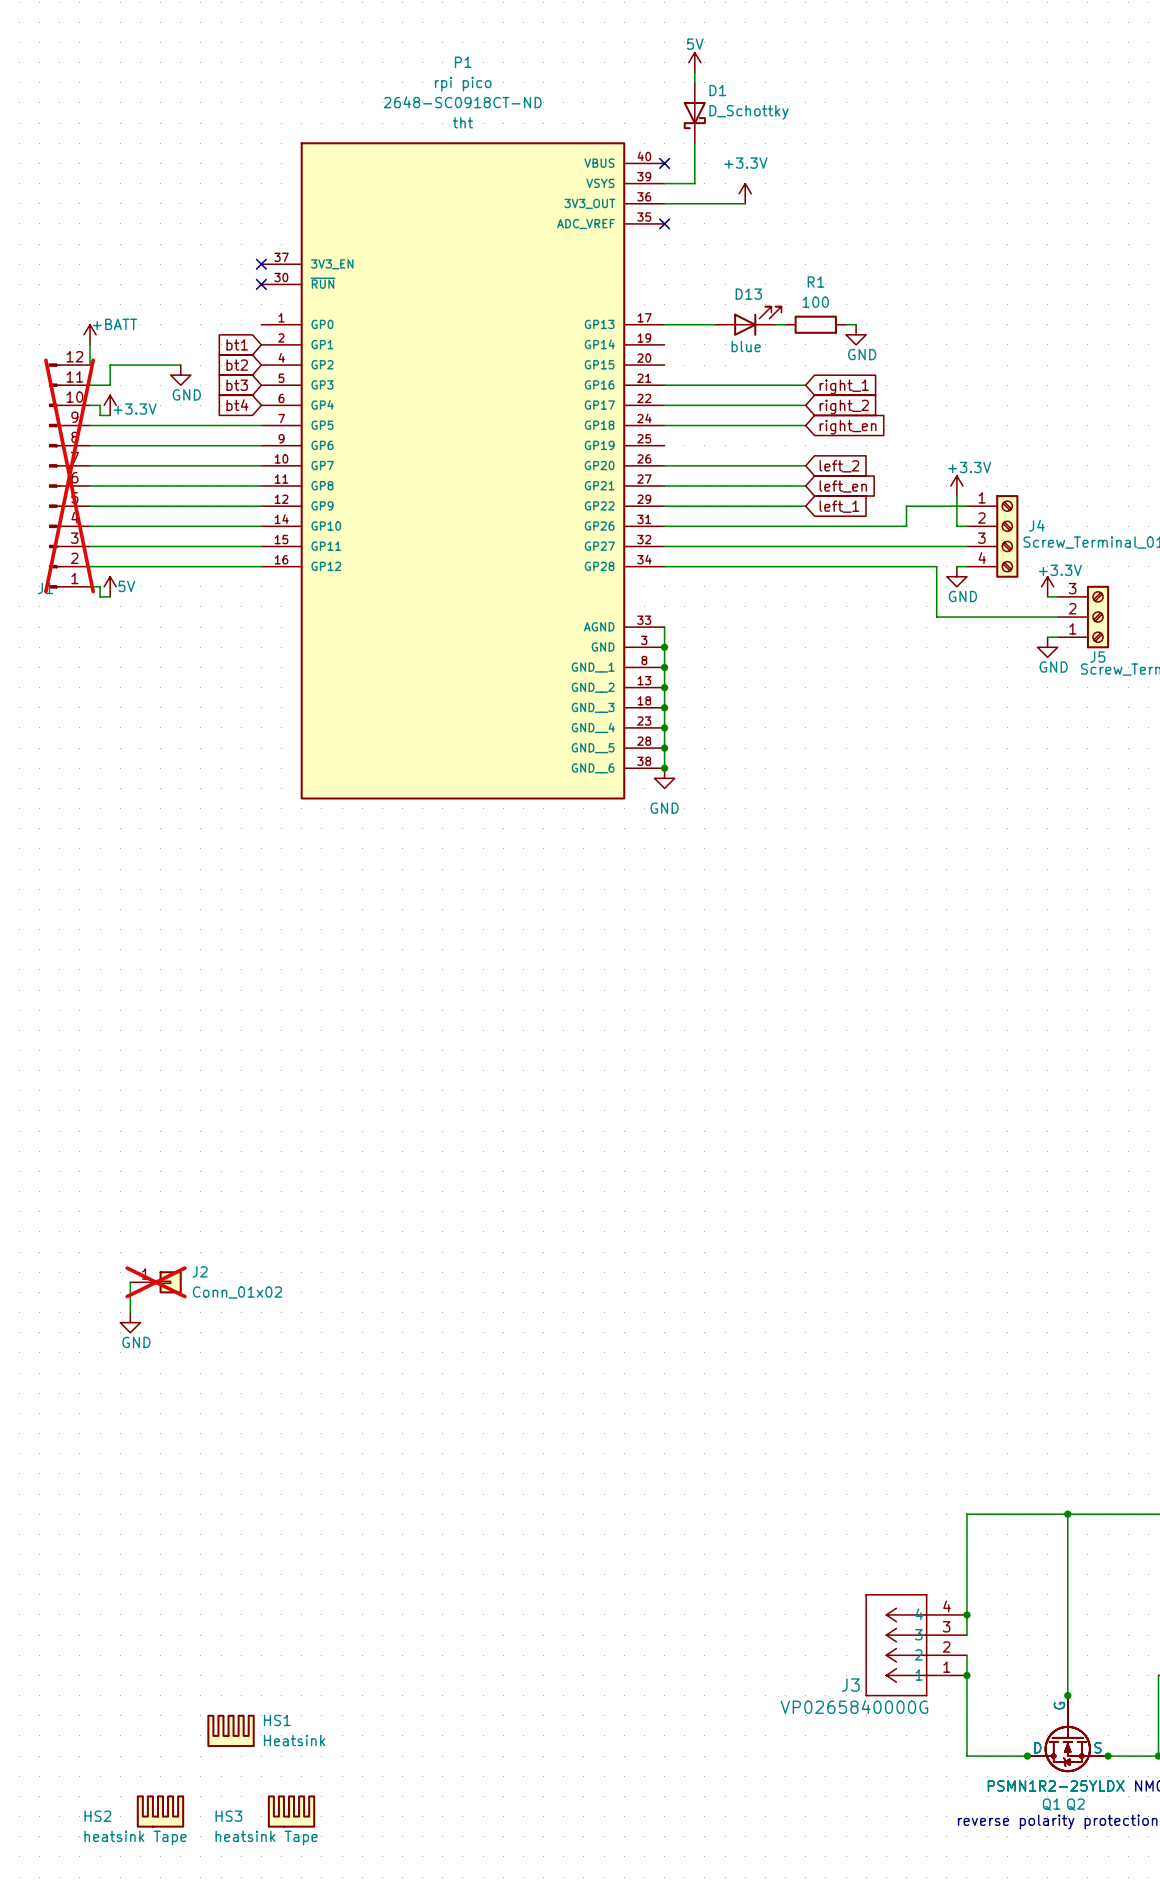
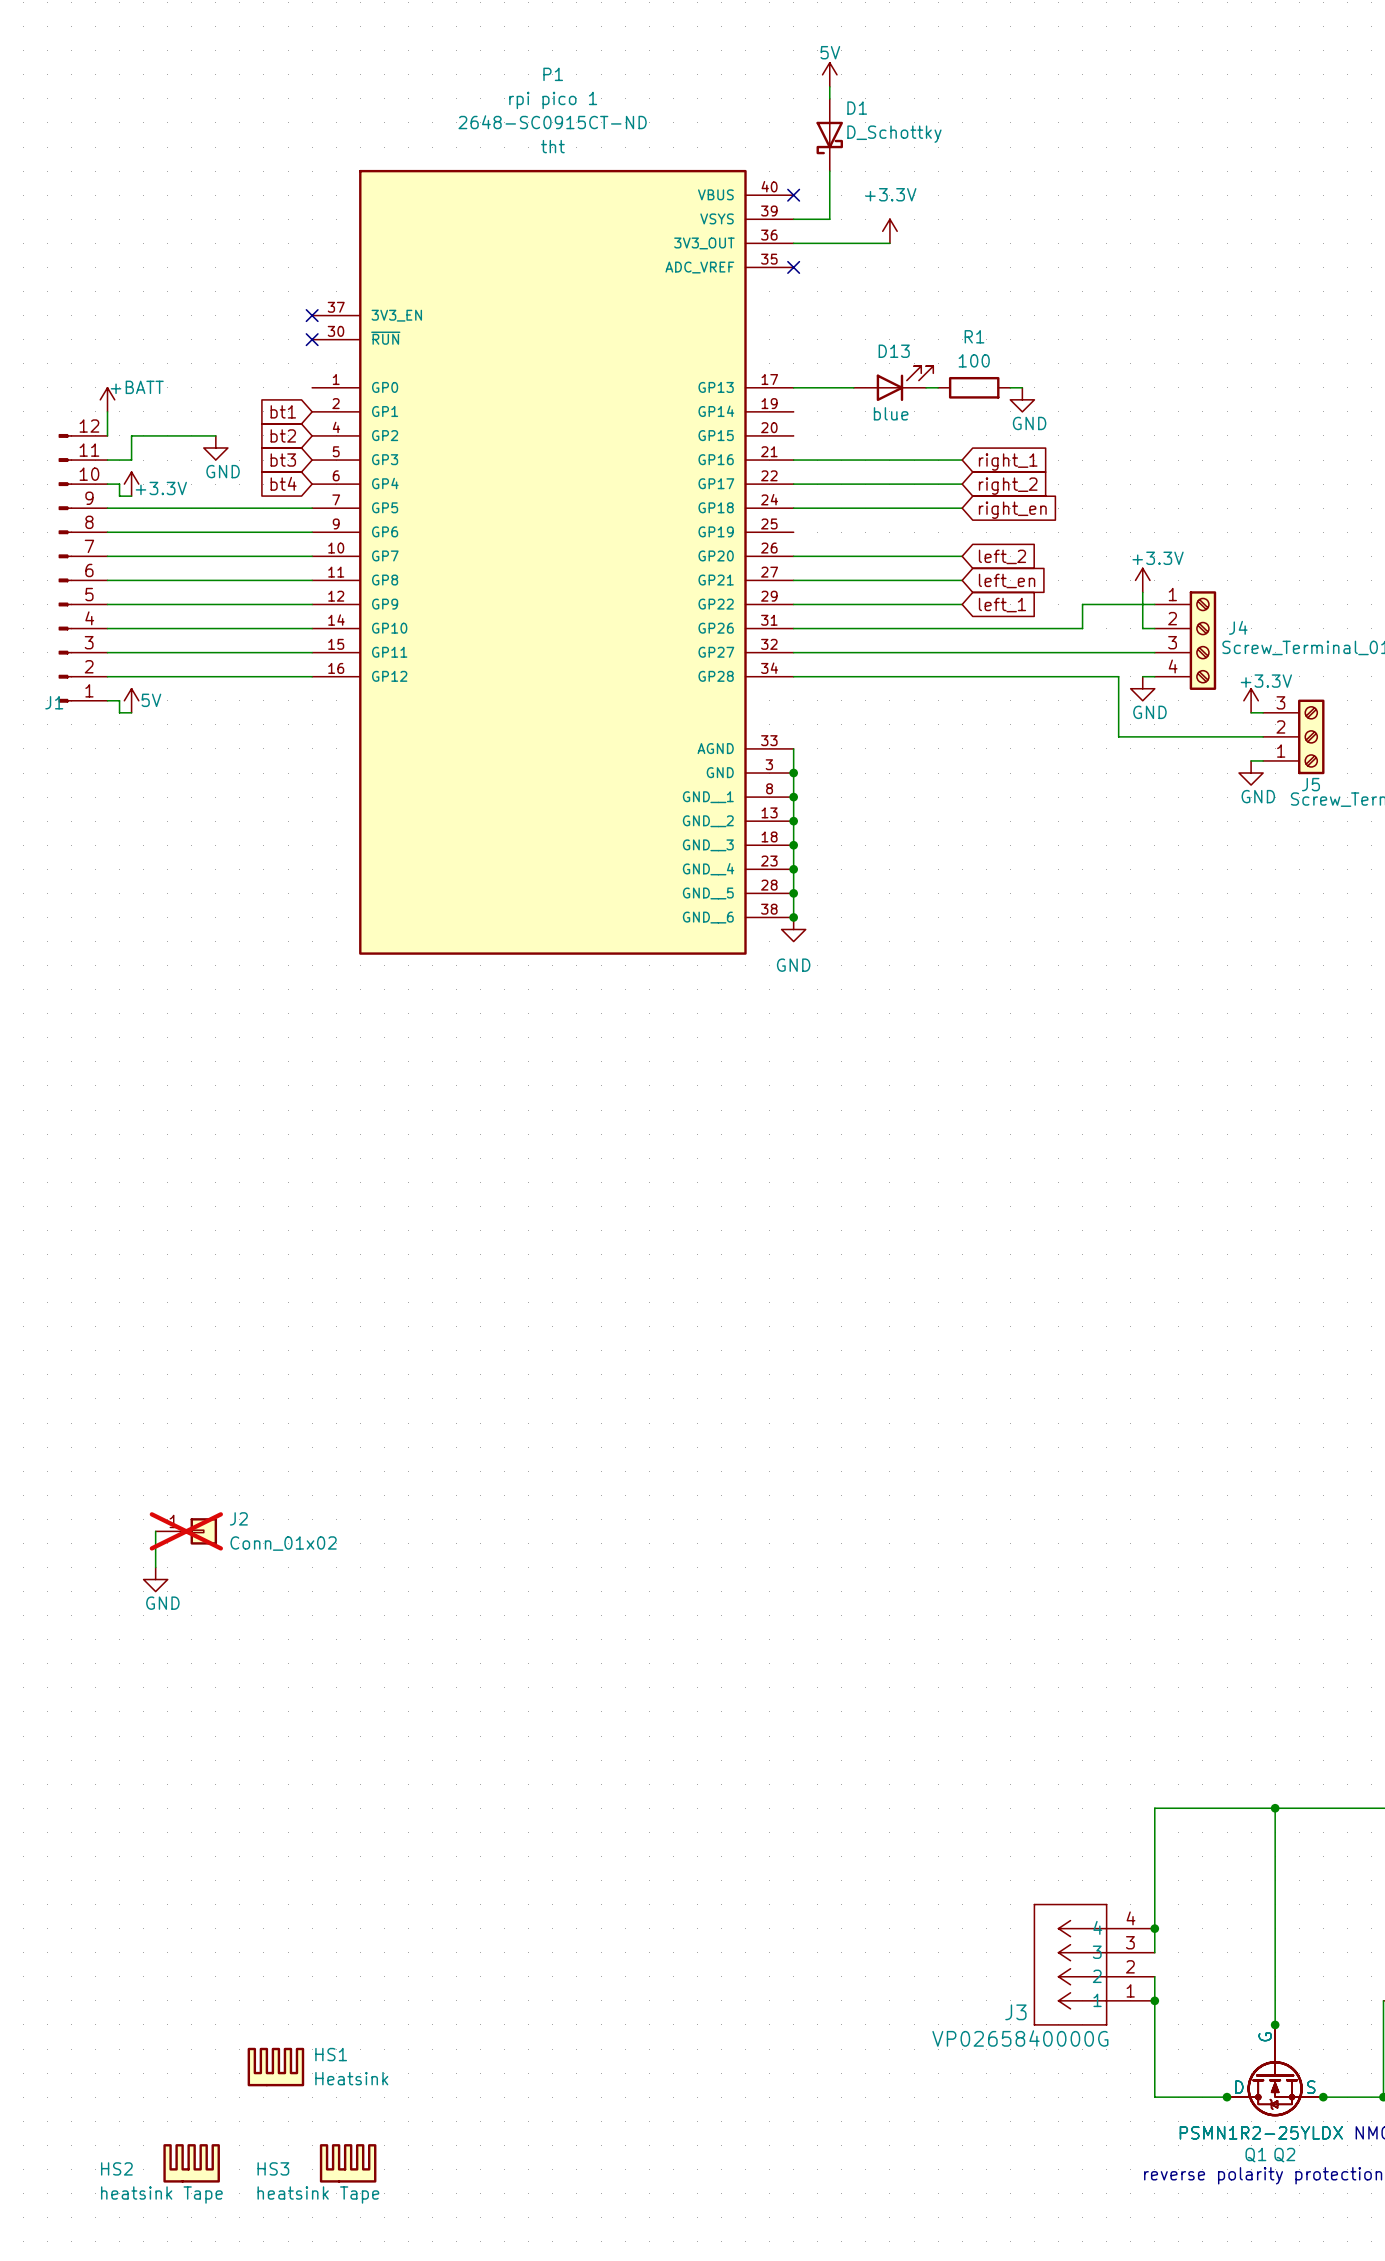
P1 value: rpi pico (463, 84) -> rpi pico 1 (553, 100)
P1 text: 2648-SC0918CT-ND (462, 102) -> 2648-SC0915CT-ND (552, 122)
J1 do-not-place cross: (69, 475) -> none

